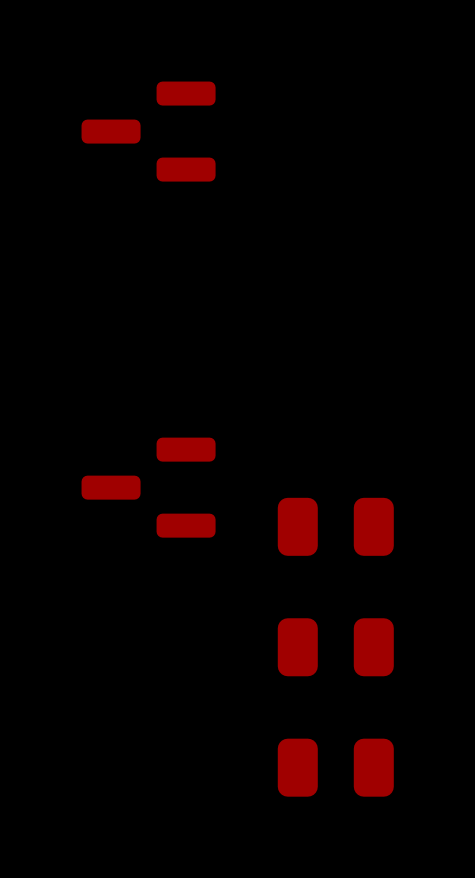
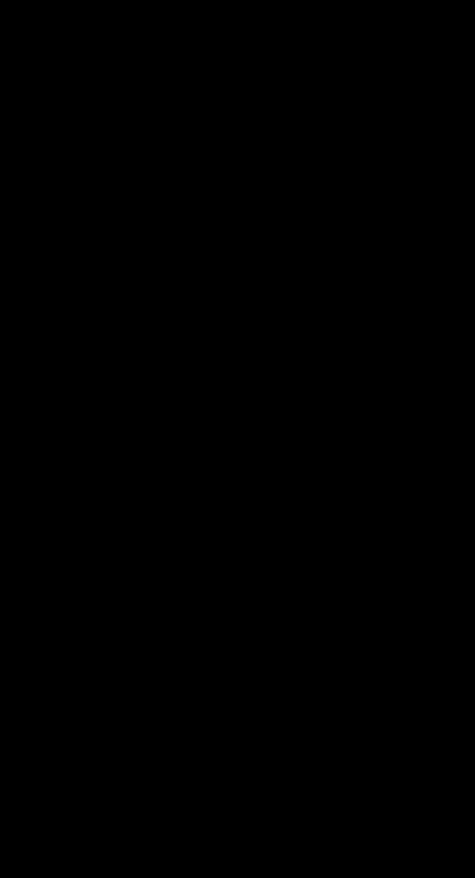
part: (148, 131) -> none
part: (148, 487) -> none
part: (335, 526) -> none
part: (335, 647) -> none
part: (335, 767) -> none

